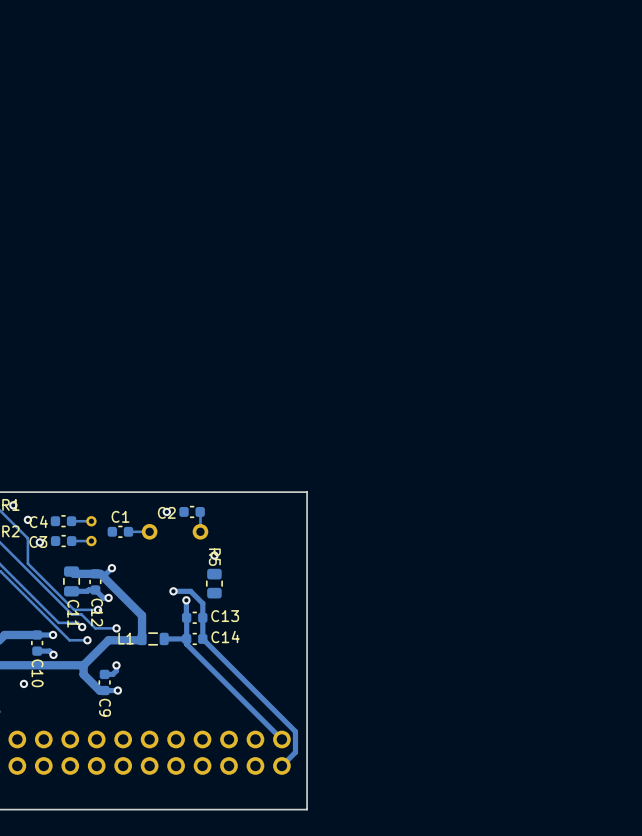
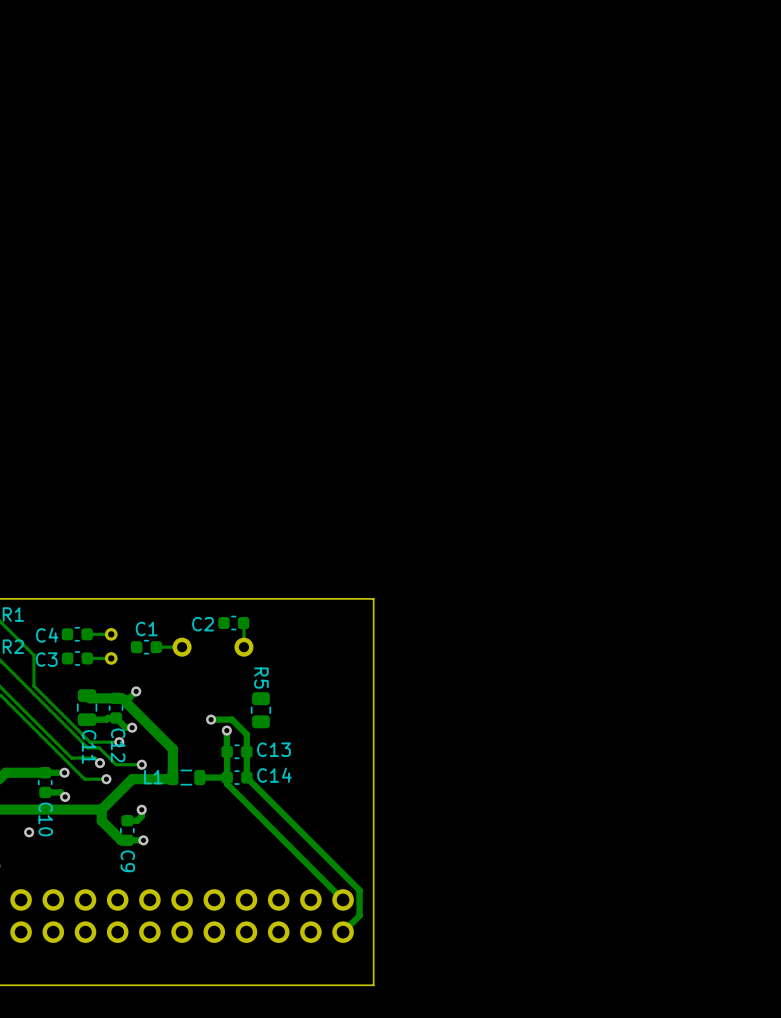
via: (13, 505) -> none
via: (166, 511) -> none
via: (27, 519) -> none
via: (39, 542) -> none
via: (214, 555) -> none

